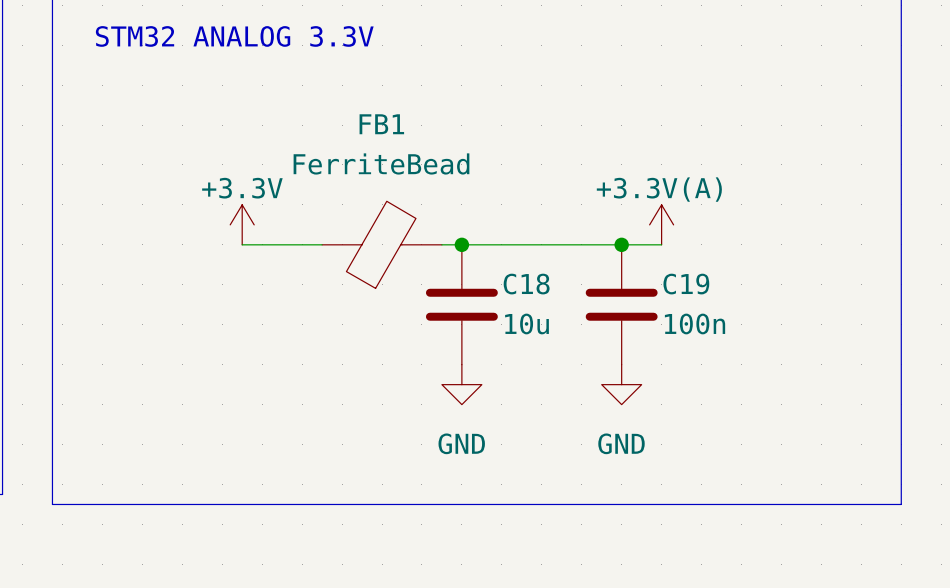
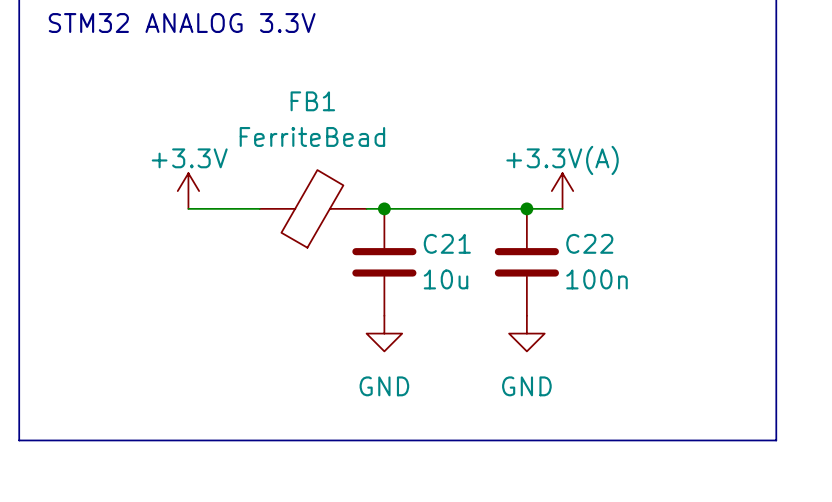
C18 name: C18 (526, 284) -> C21 (447, 243)
C19 name: C19 (686, 284) -> C22 (589, 243)

